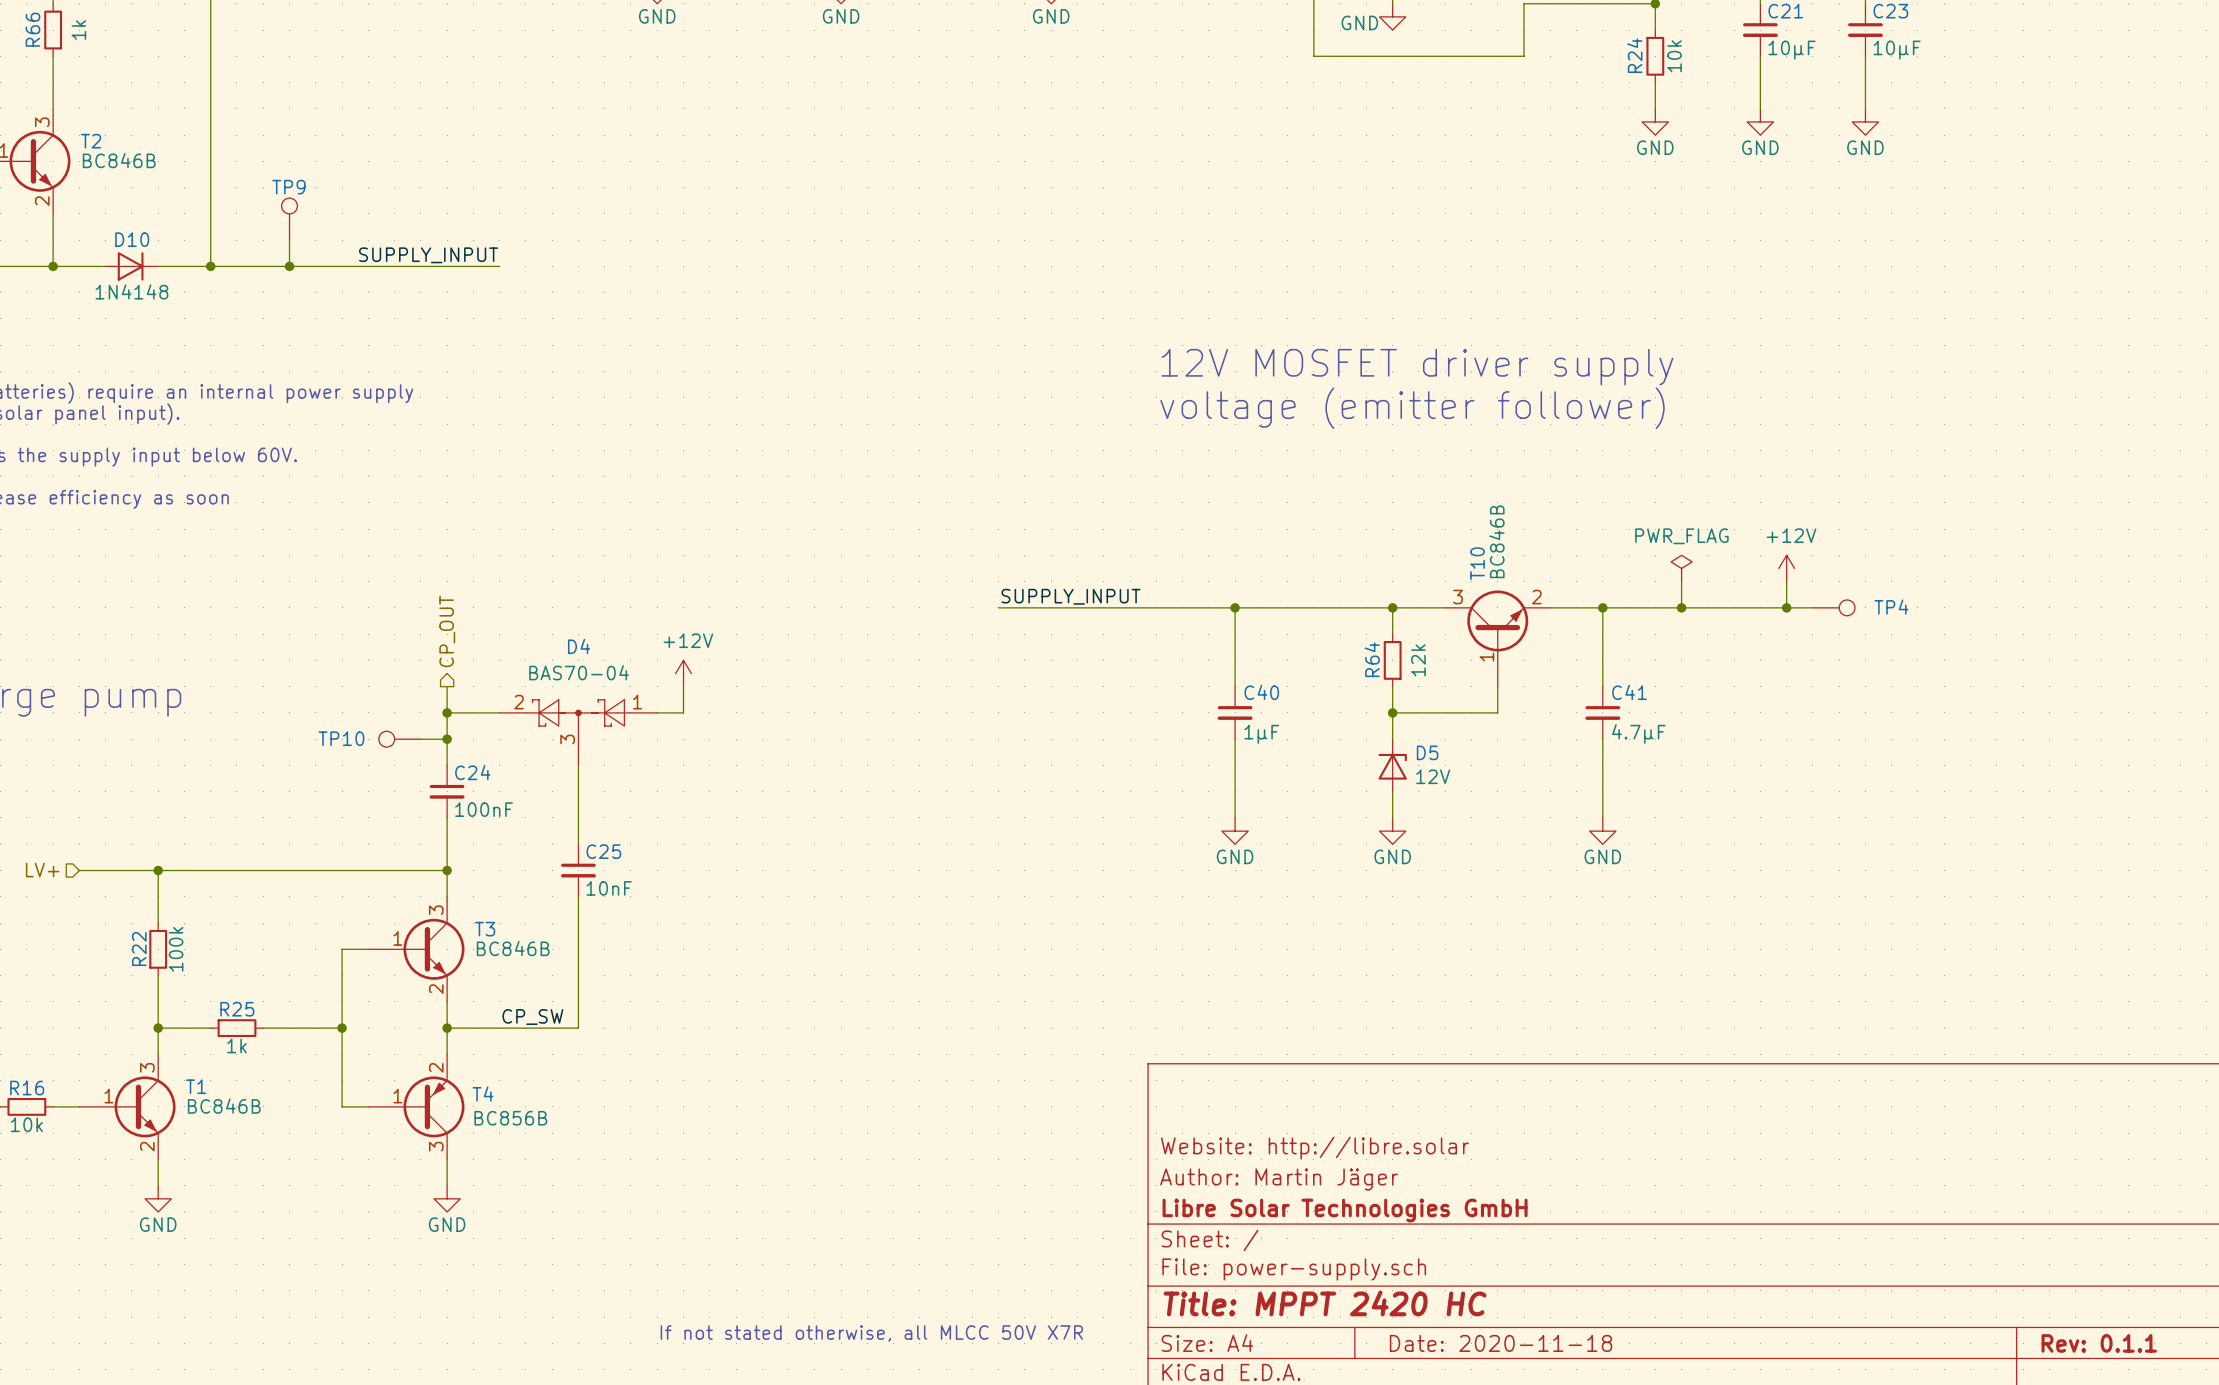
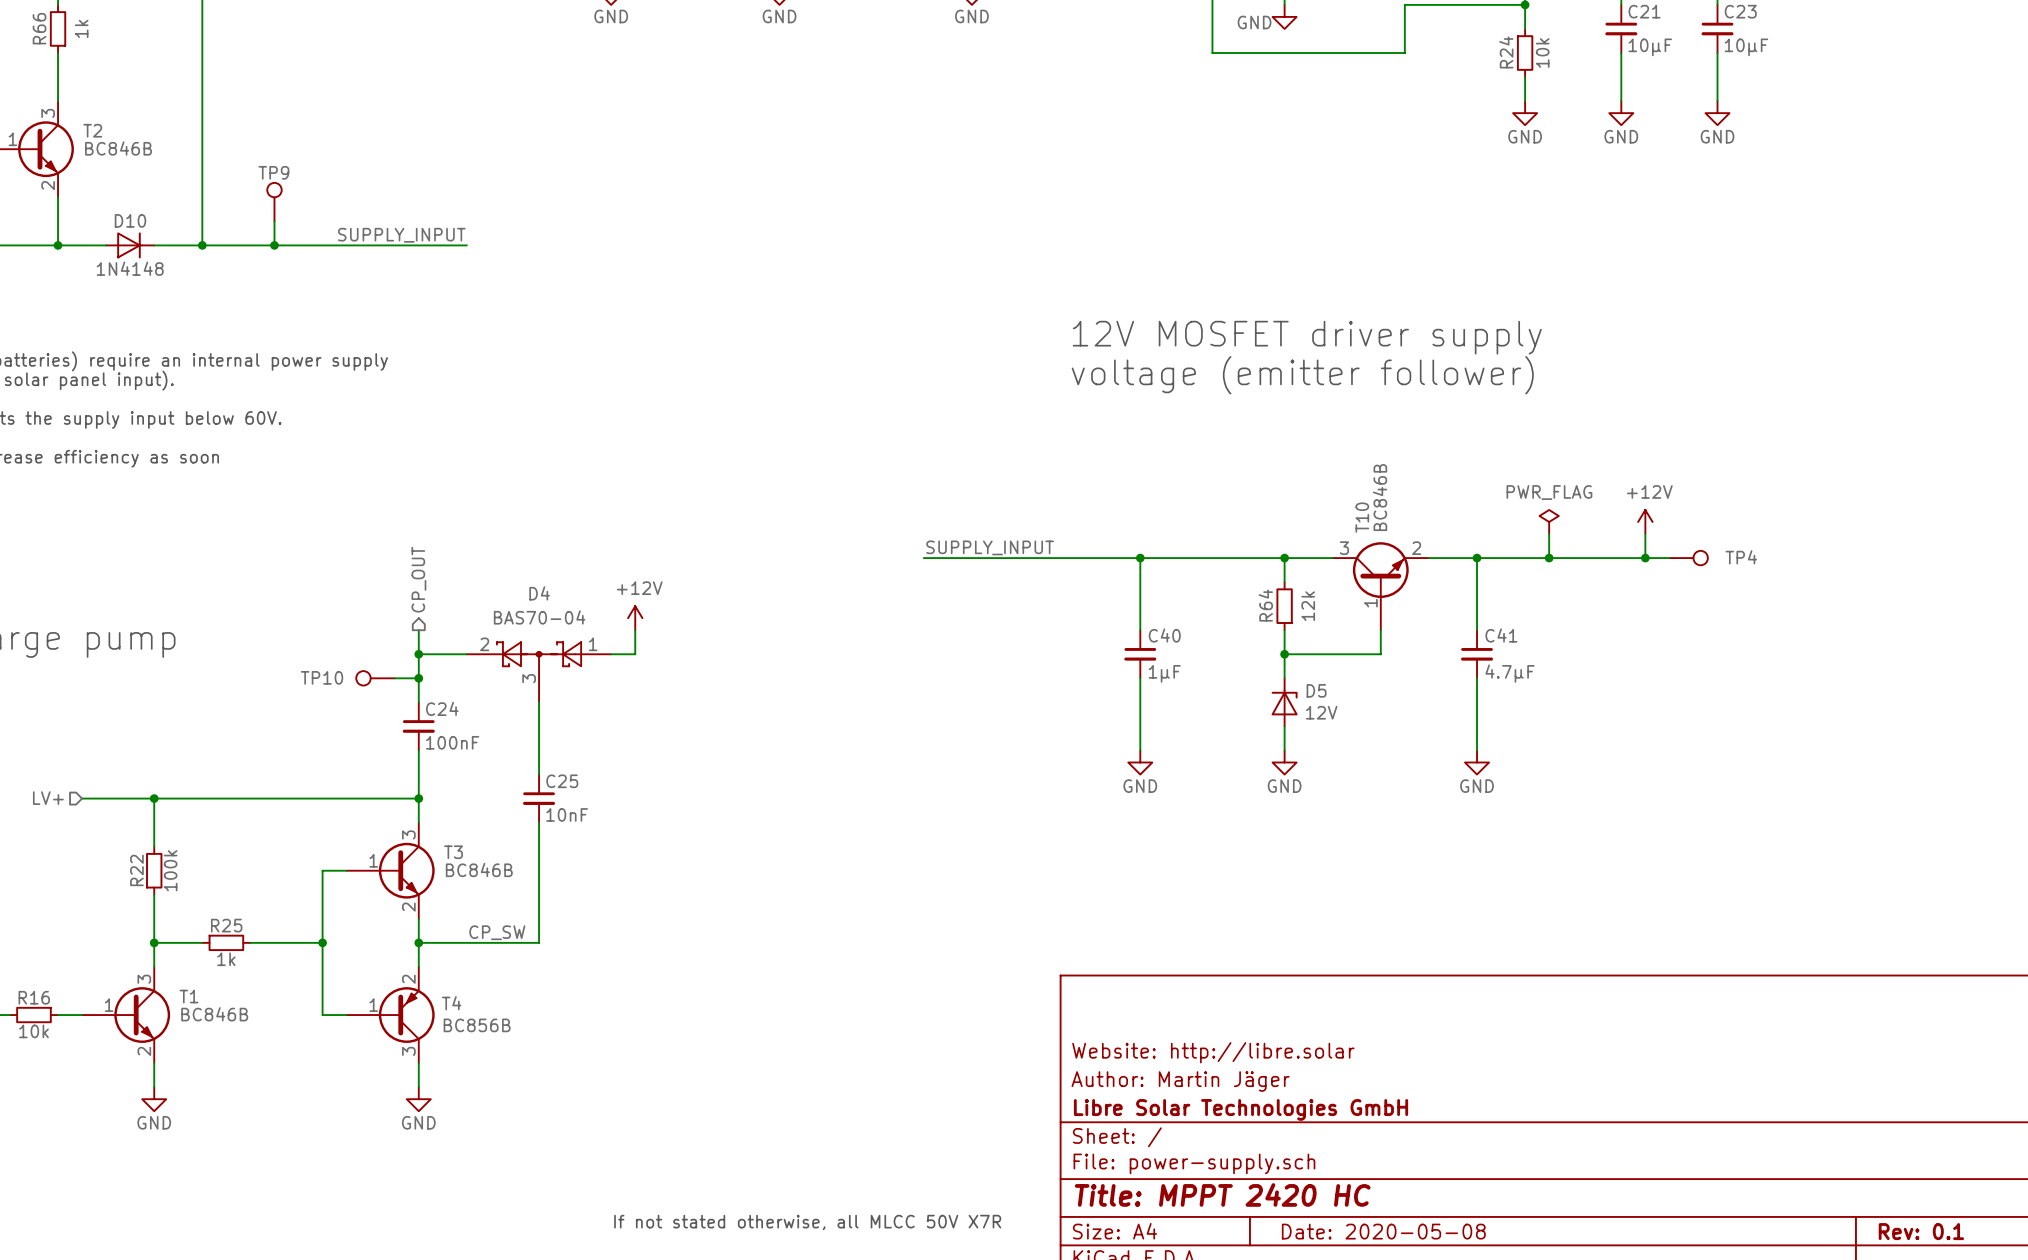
title block: Date: 2020-11-18 (1501, 1343) -> Date: 2020-05-08 (1383, 1231)
title block: Rev: 0.1.1 (2099, 1343) -> Rev: 0.1 (1921, 1231)

